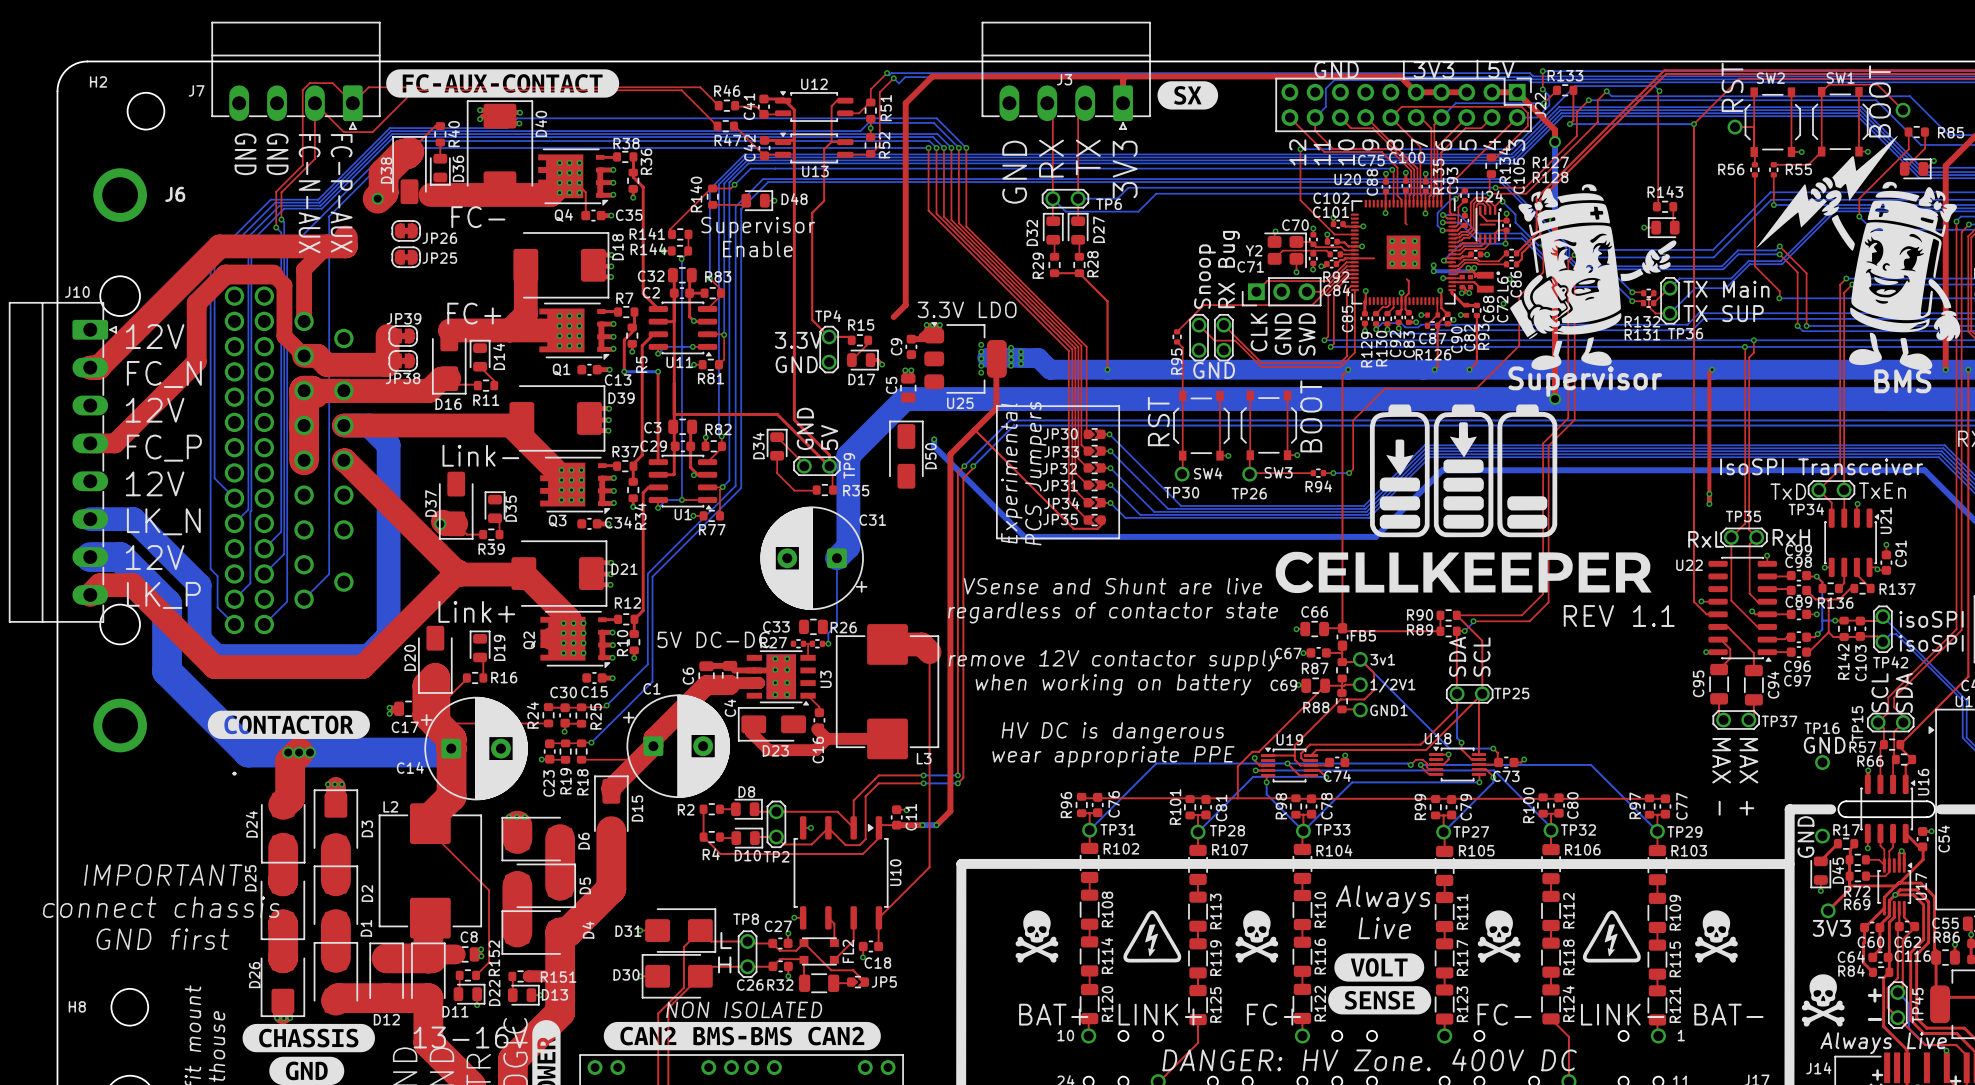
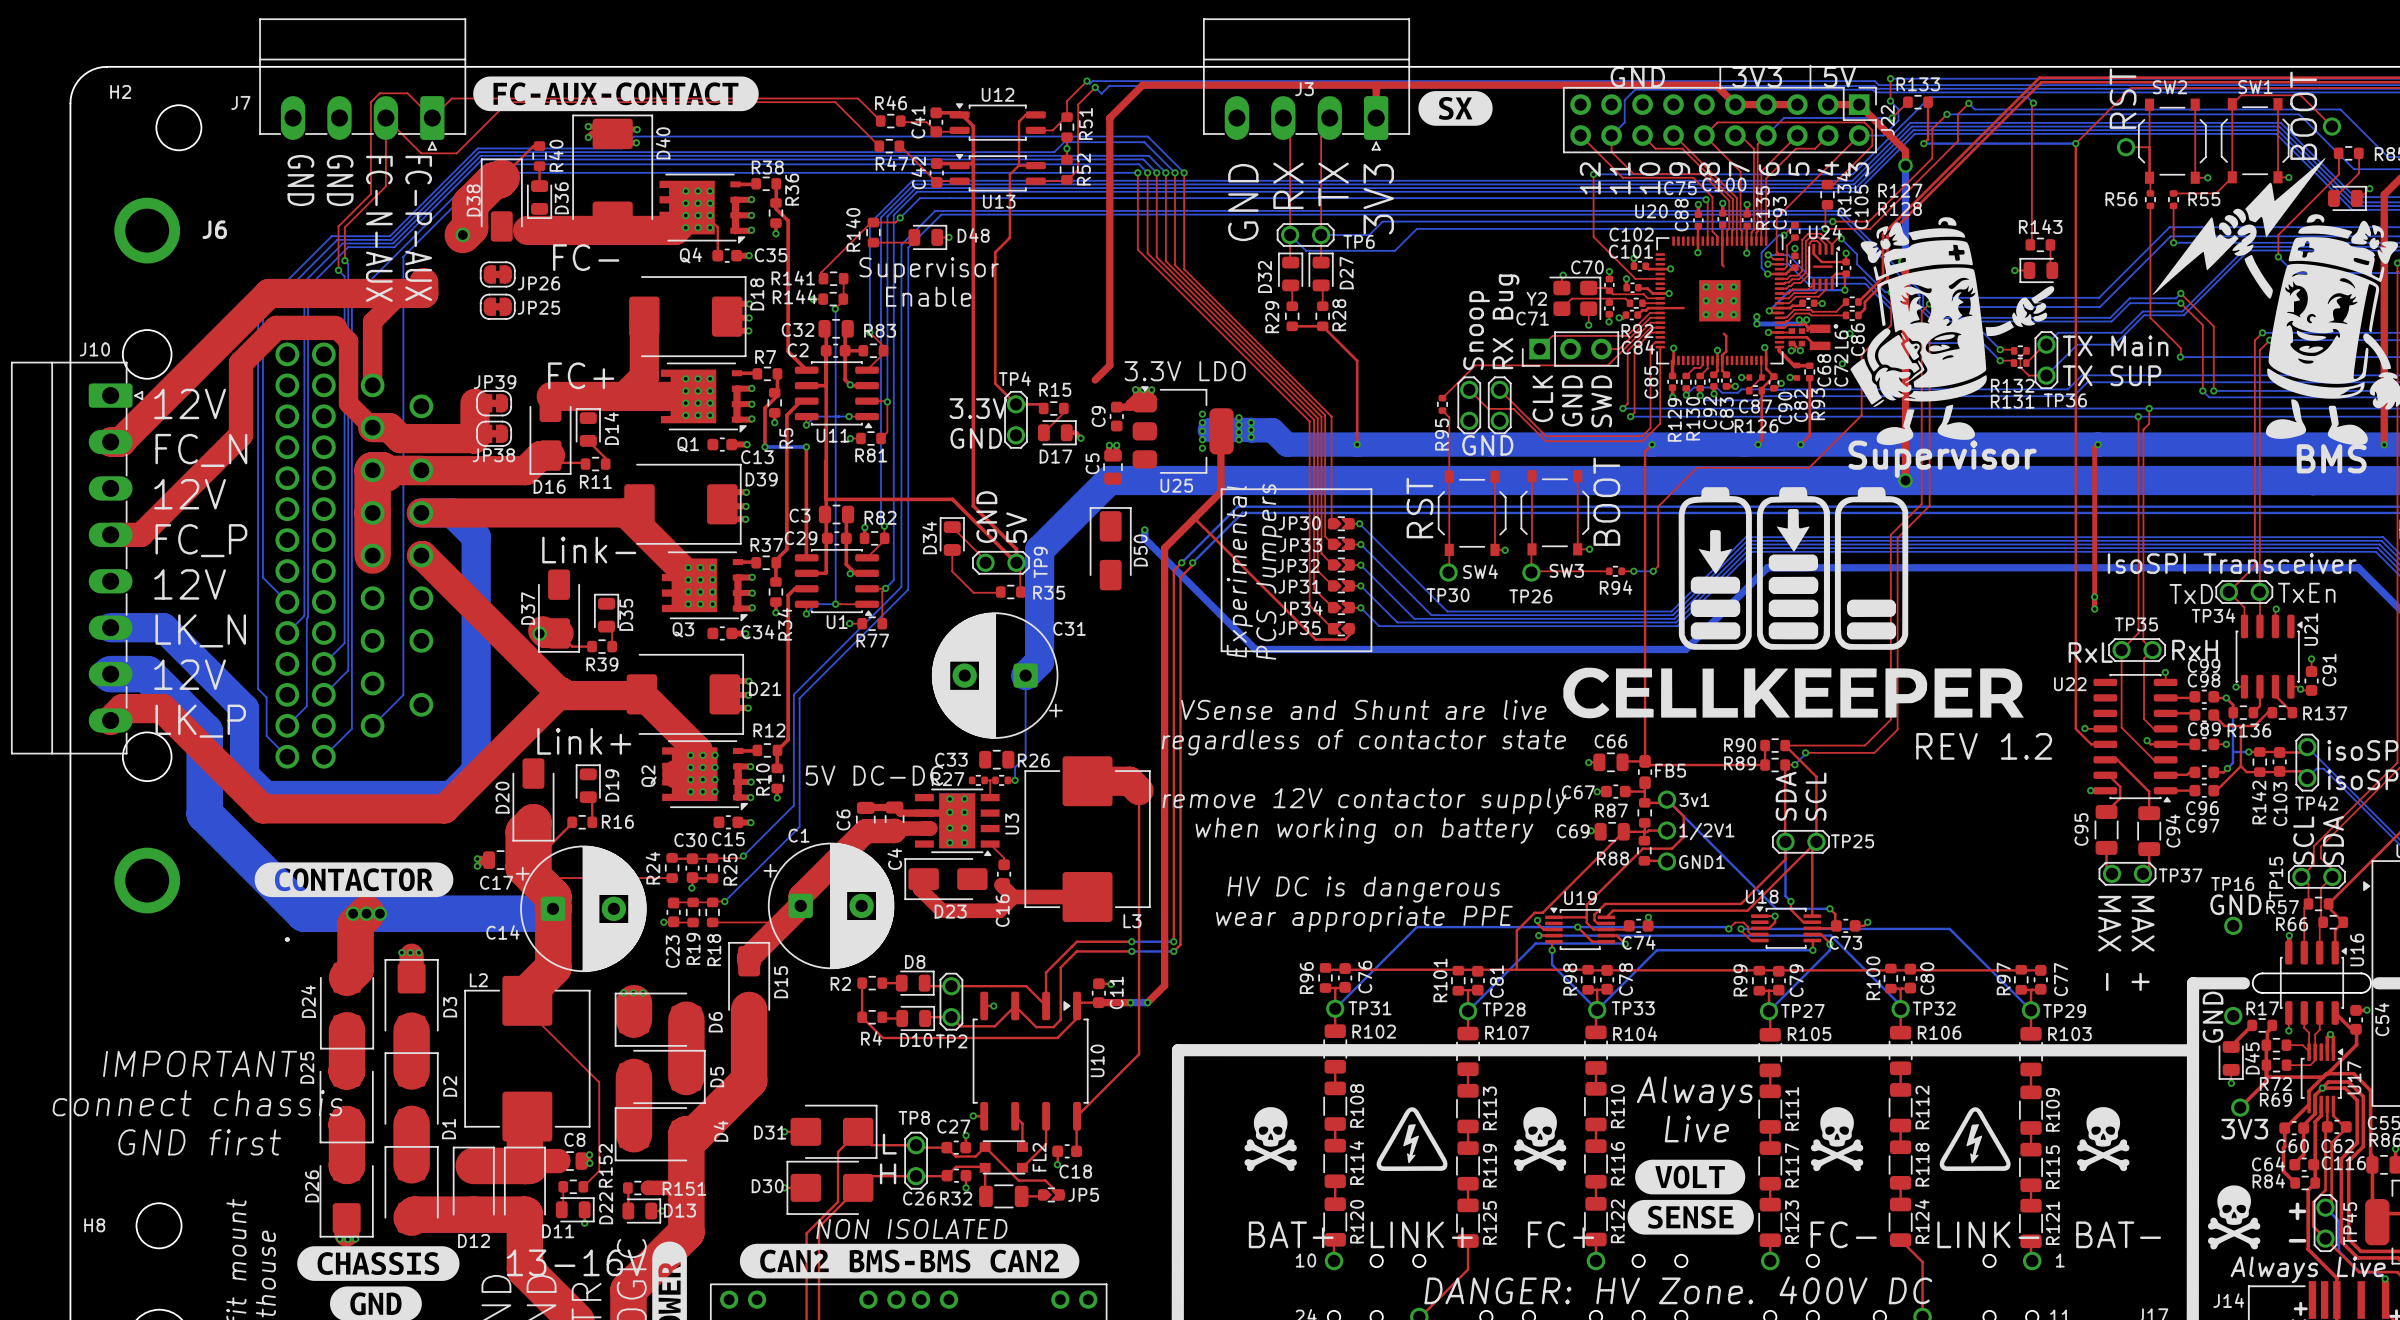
text: REV 1.1 (1619, 616) -> REV 1.2 (1984, 746)

